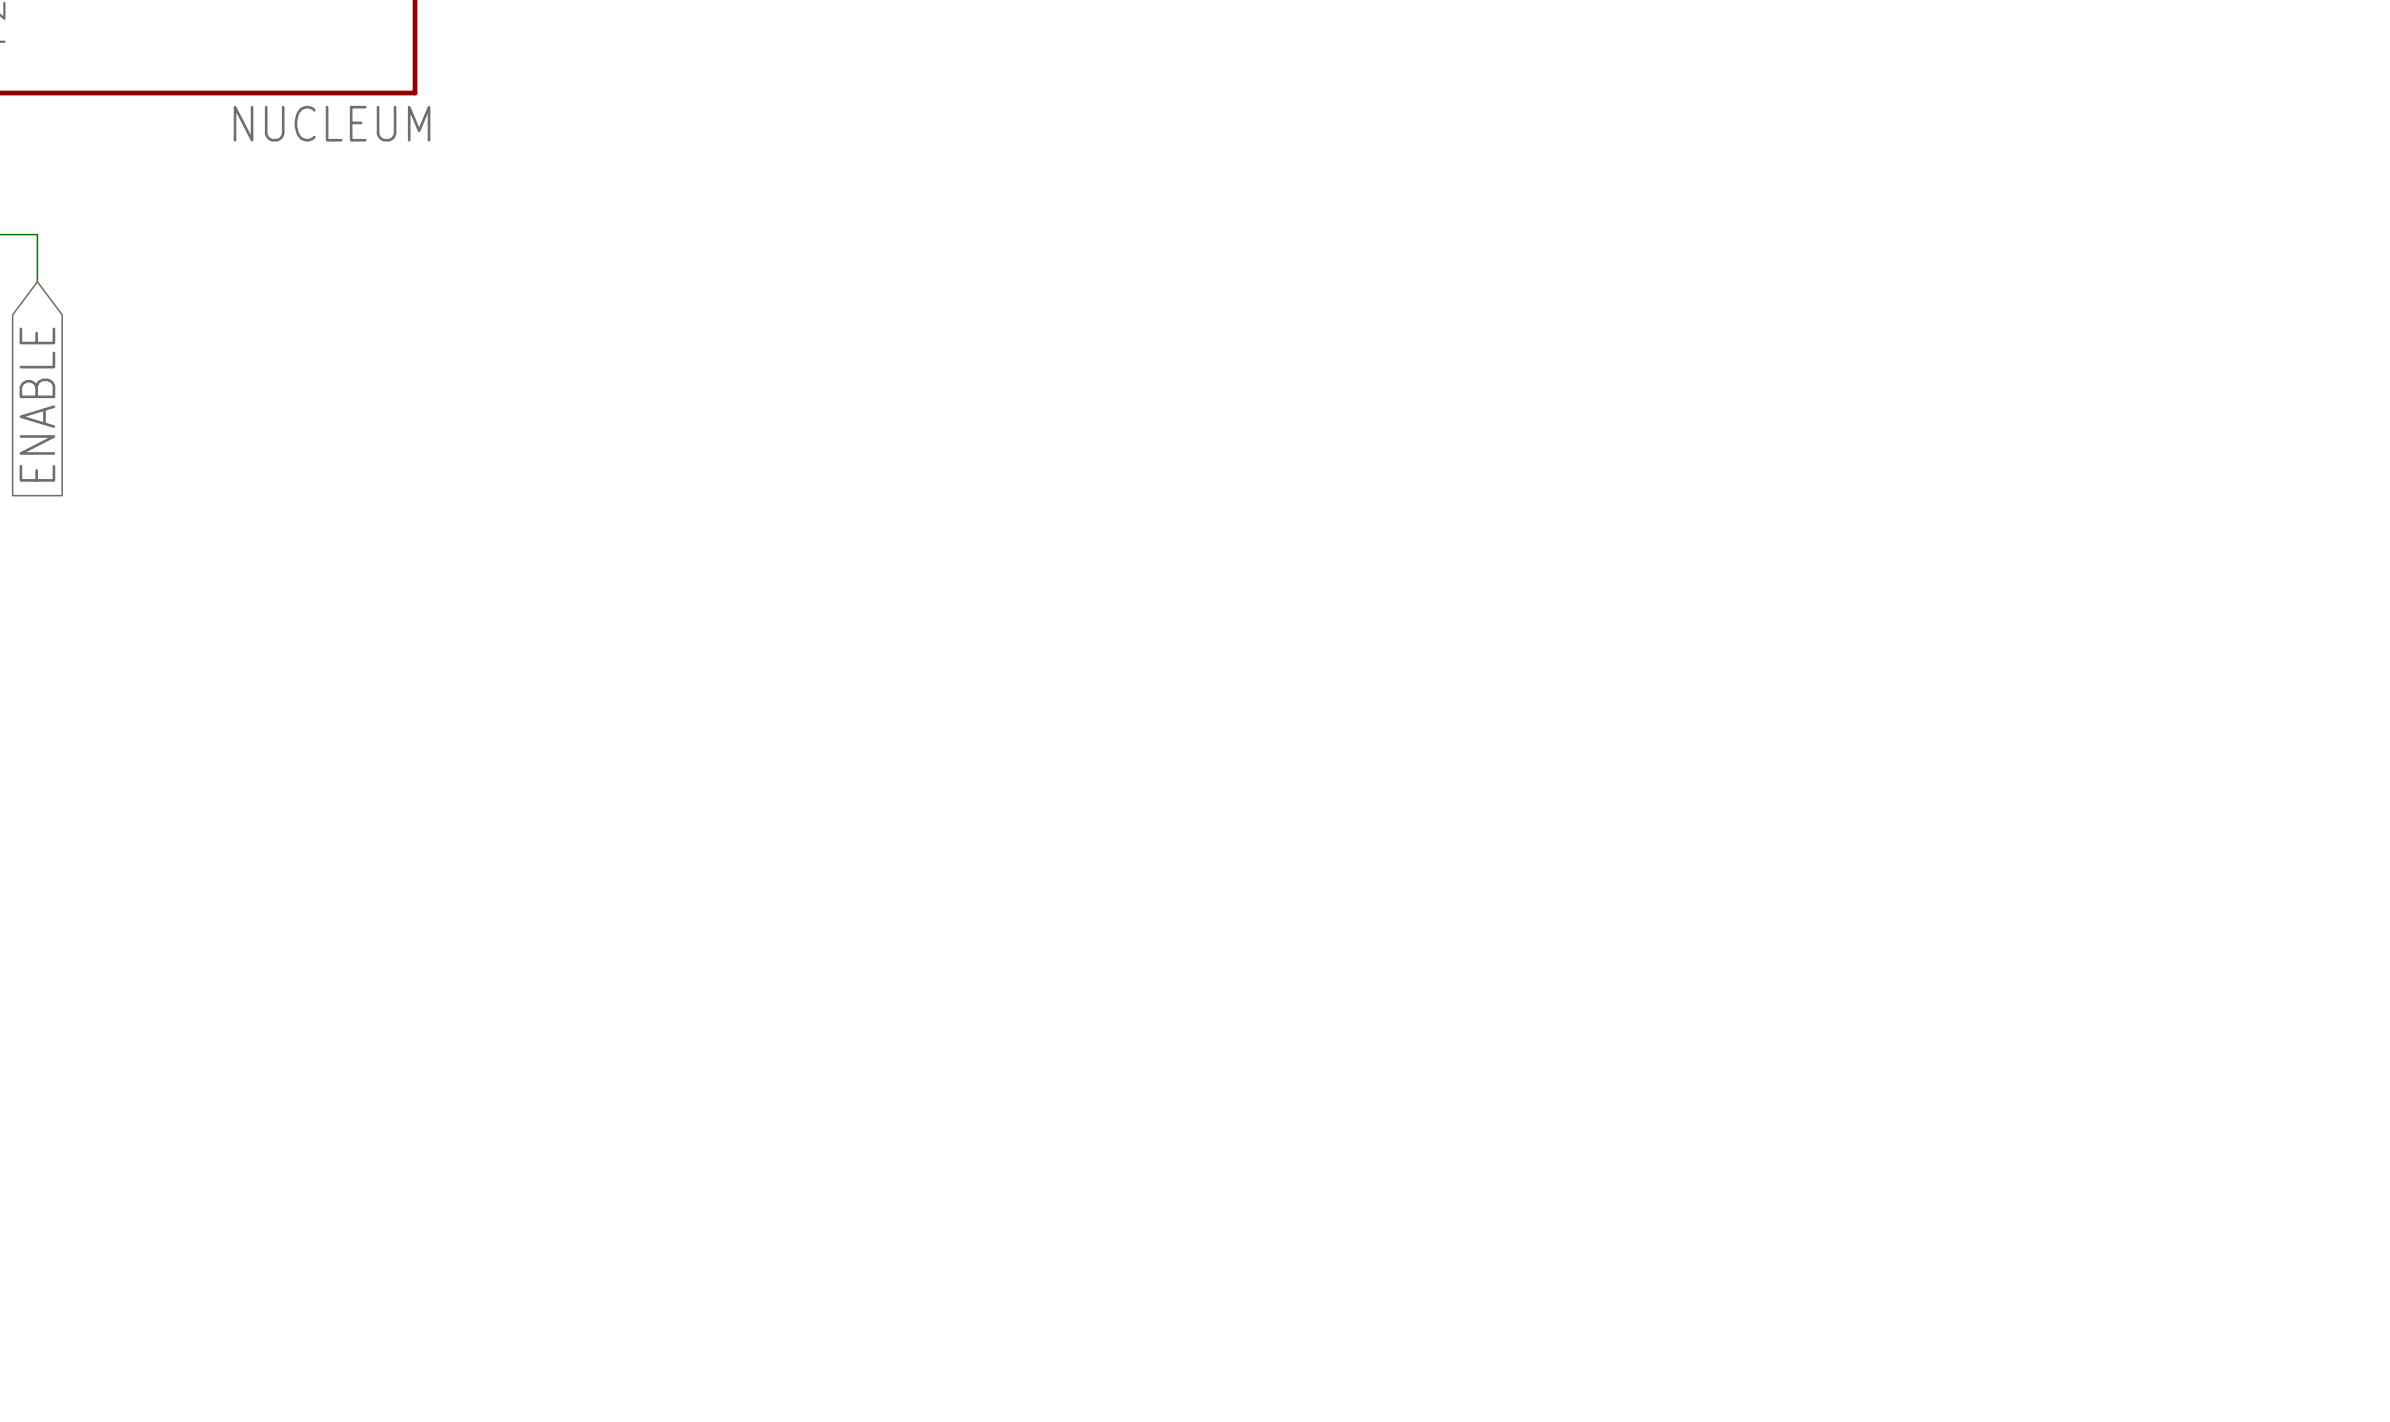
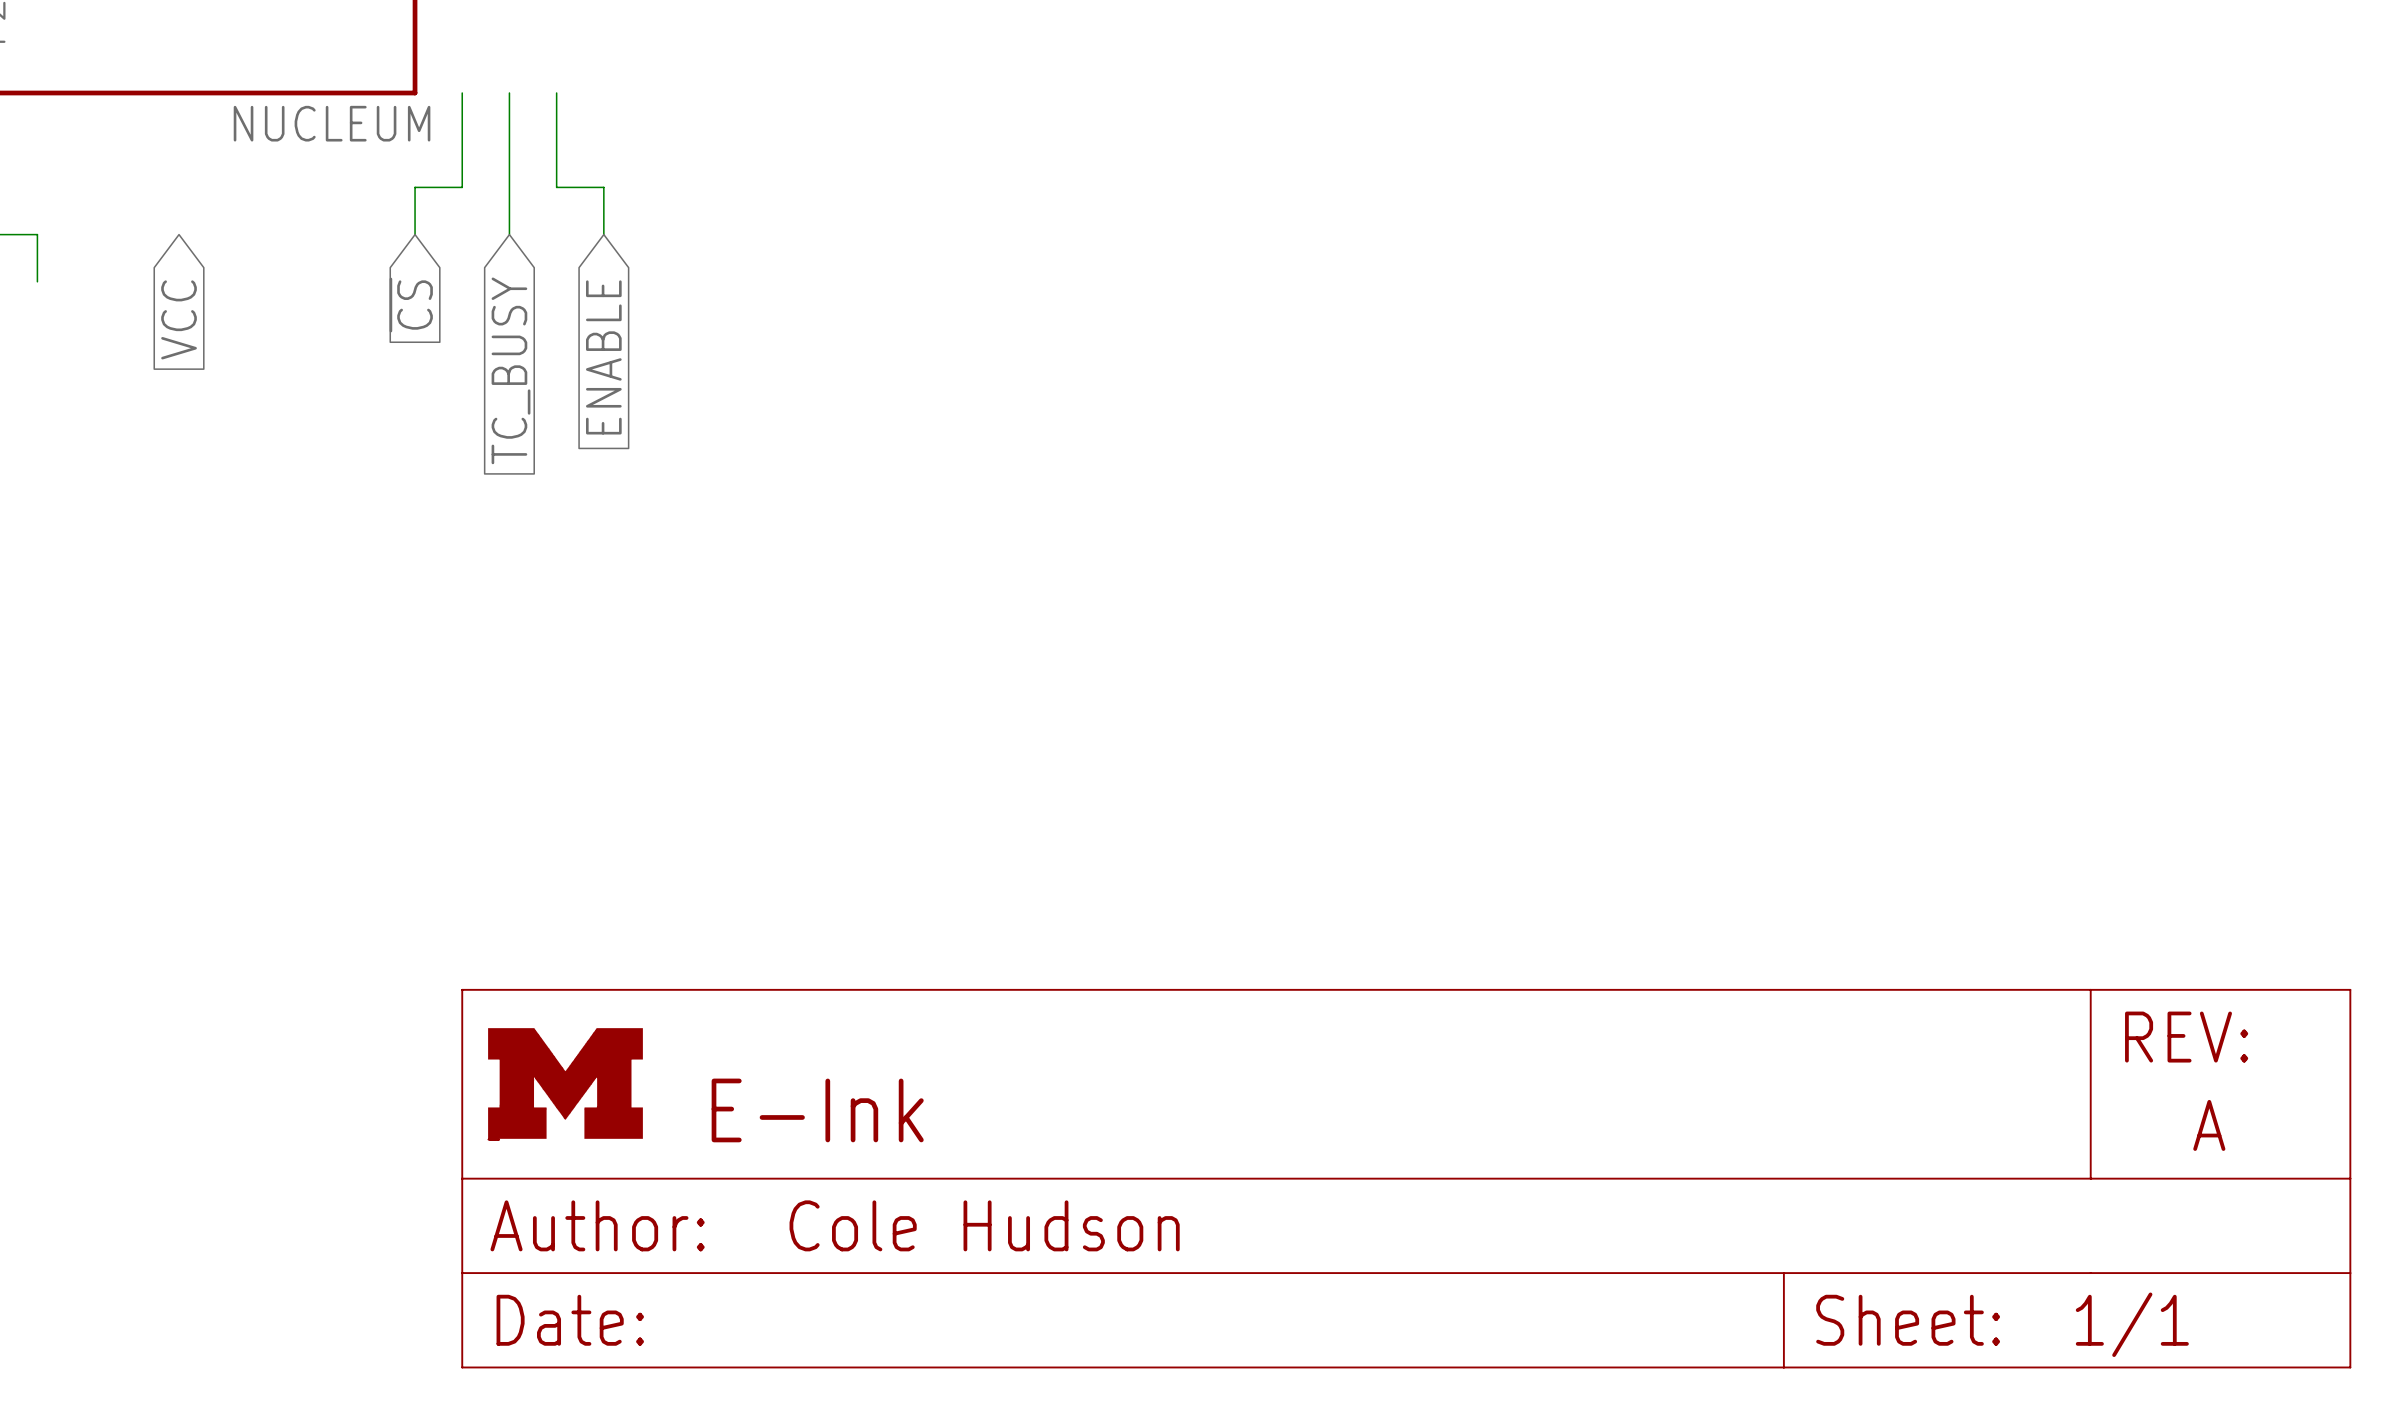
wire: none -> (462, 93) (462, 187) (415, 187) (415, 234)
wire: none -> (509, 93) (509, 234)
wire: none -> (556, 93) (556, 187) (603, 187) (603, 234)
global label: none -> ~{CS} (411, 305)
global label: none -> VCC (179, 319)
global label: none -> ENABLE (603, 357)
global label: none -> TC_BUSY (511, 370)
global label: ENABLE (37, 404) -> none
part: none -> (1406, 1178)

